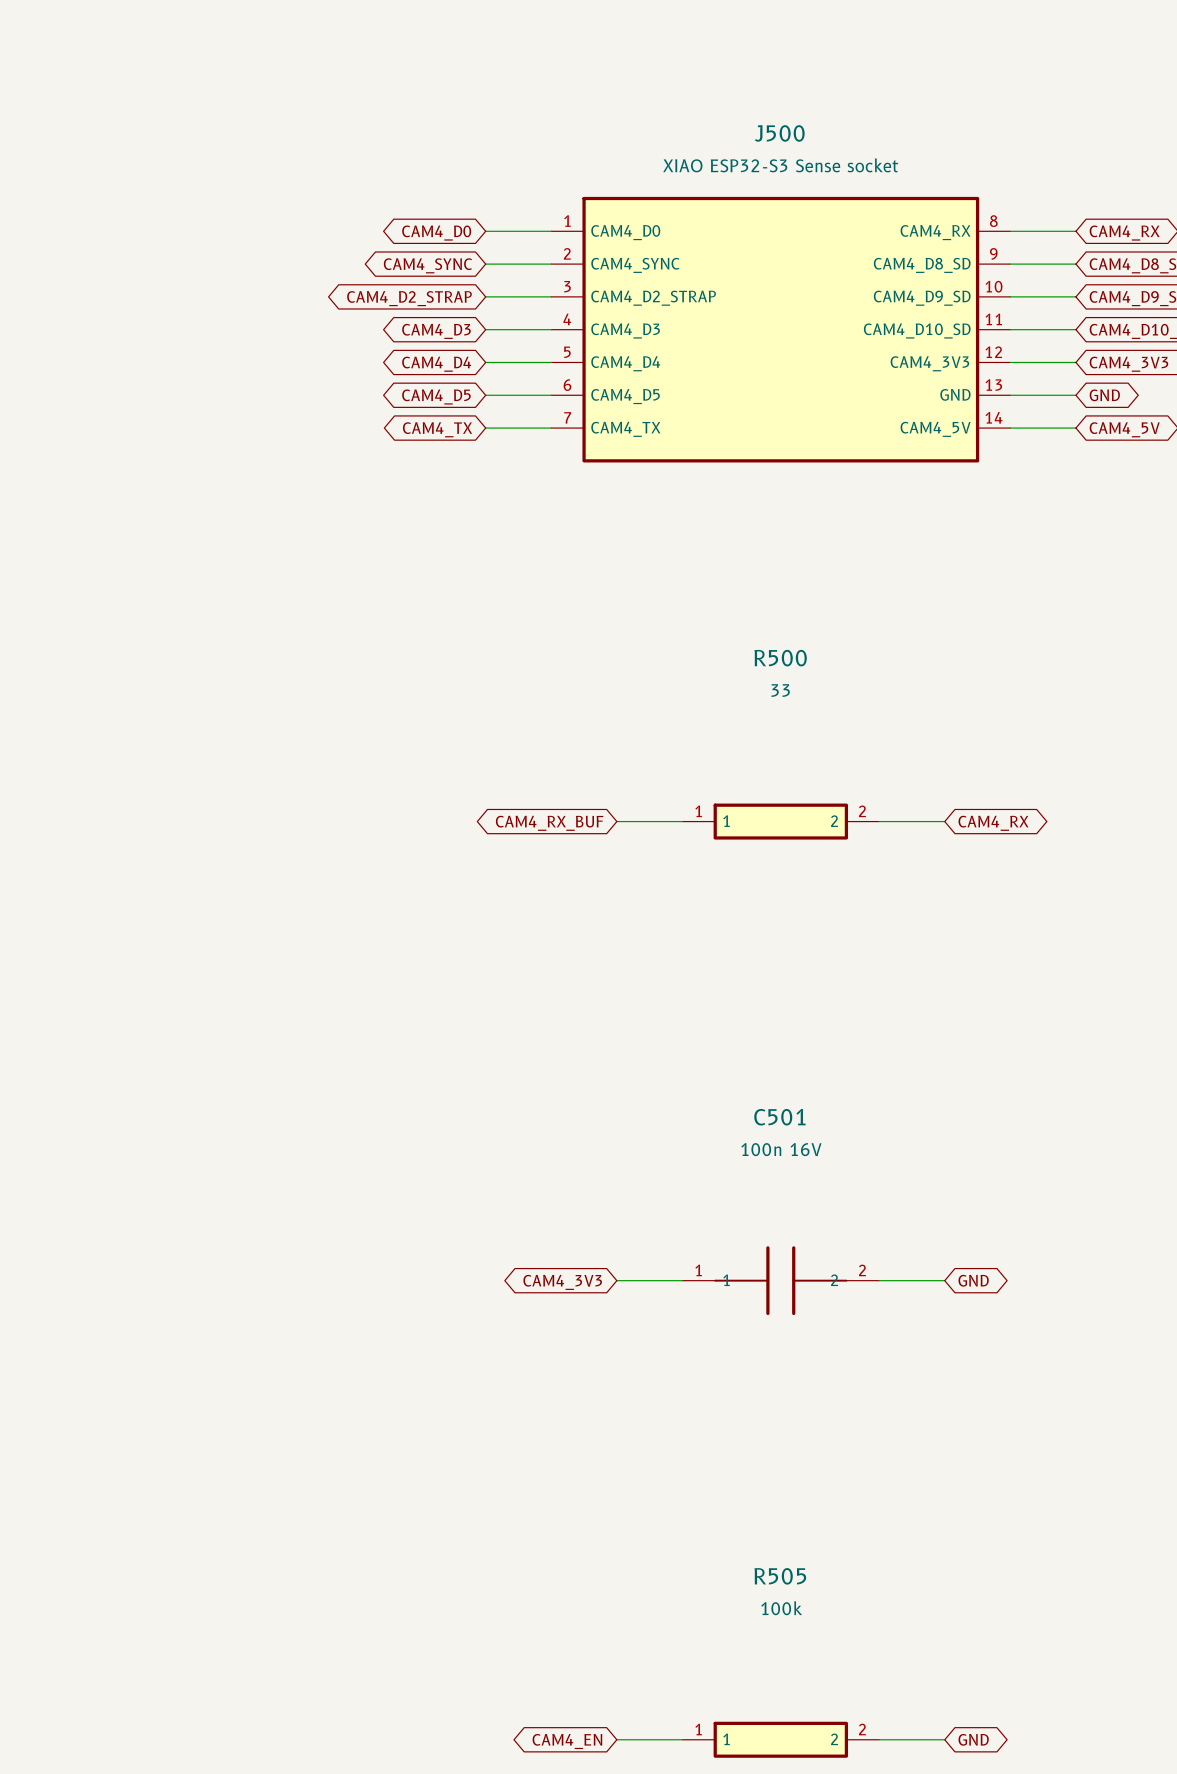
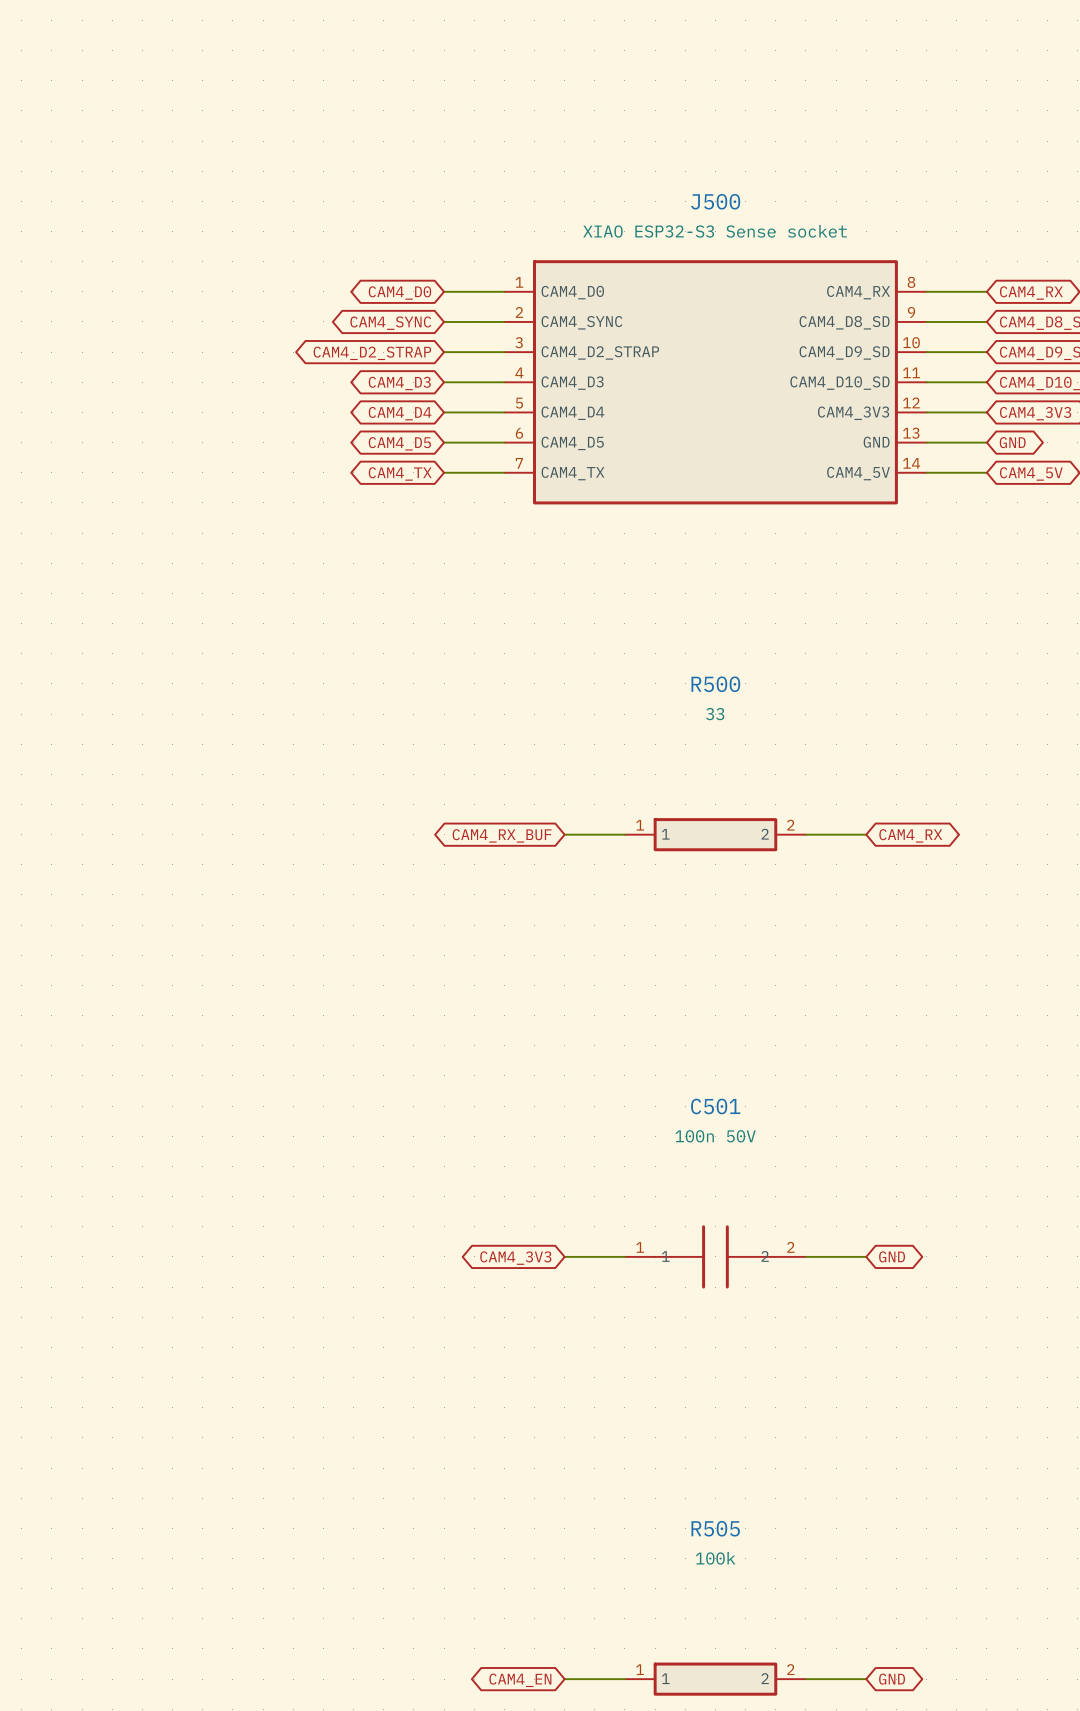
C501 value: 100n 16V (781, 1149) -> 100n 50V (715, 1136)

